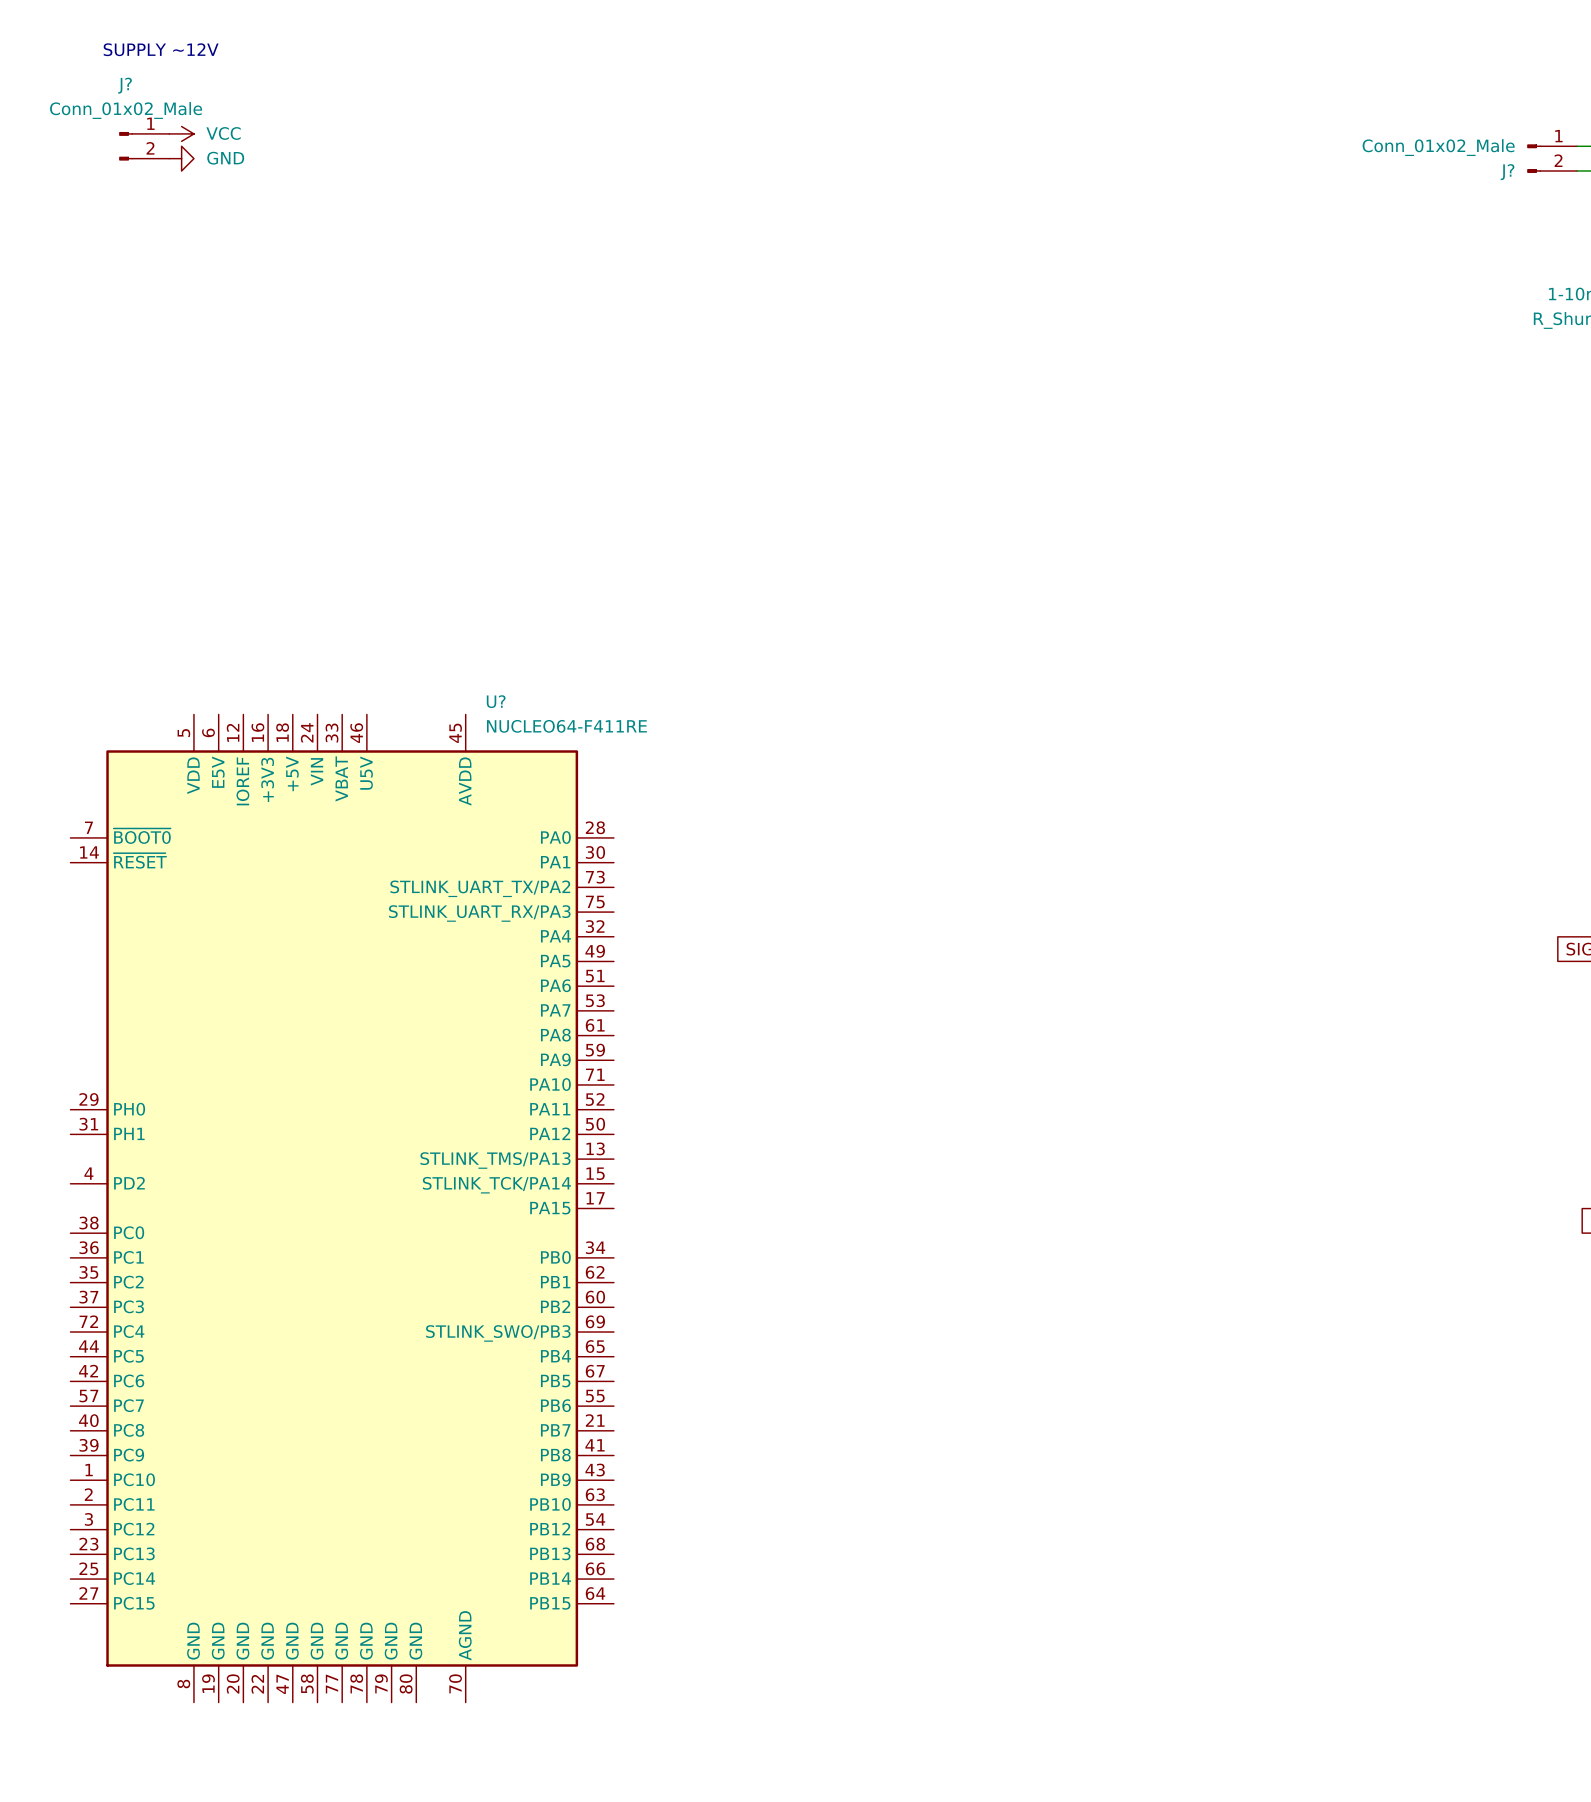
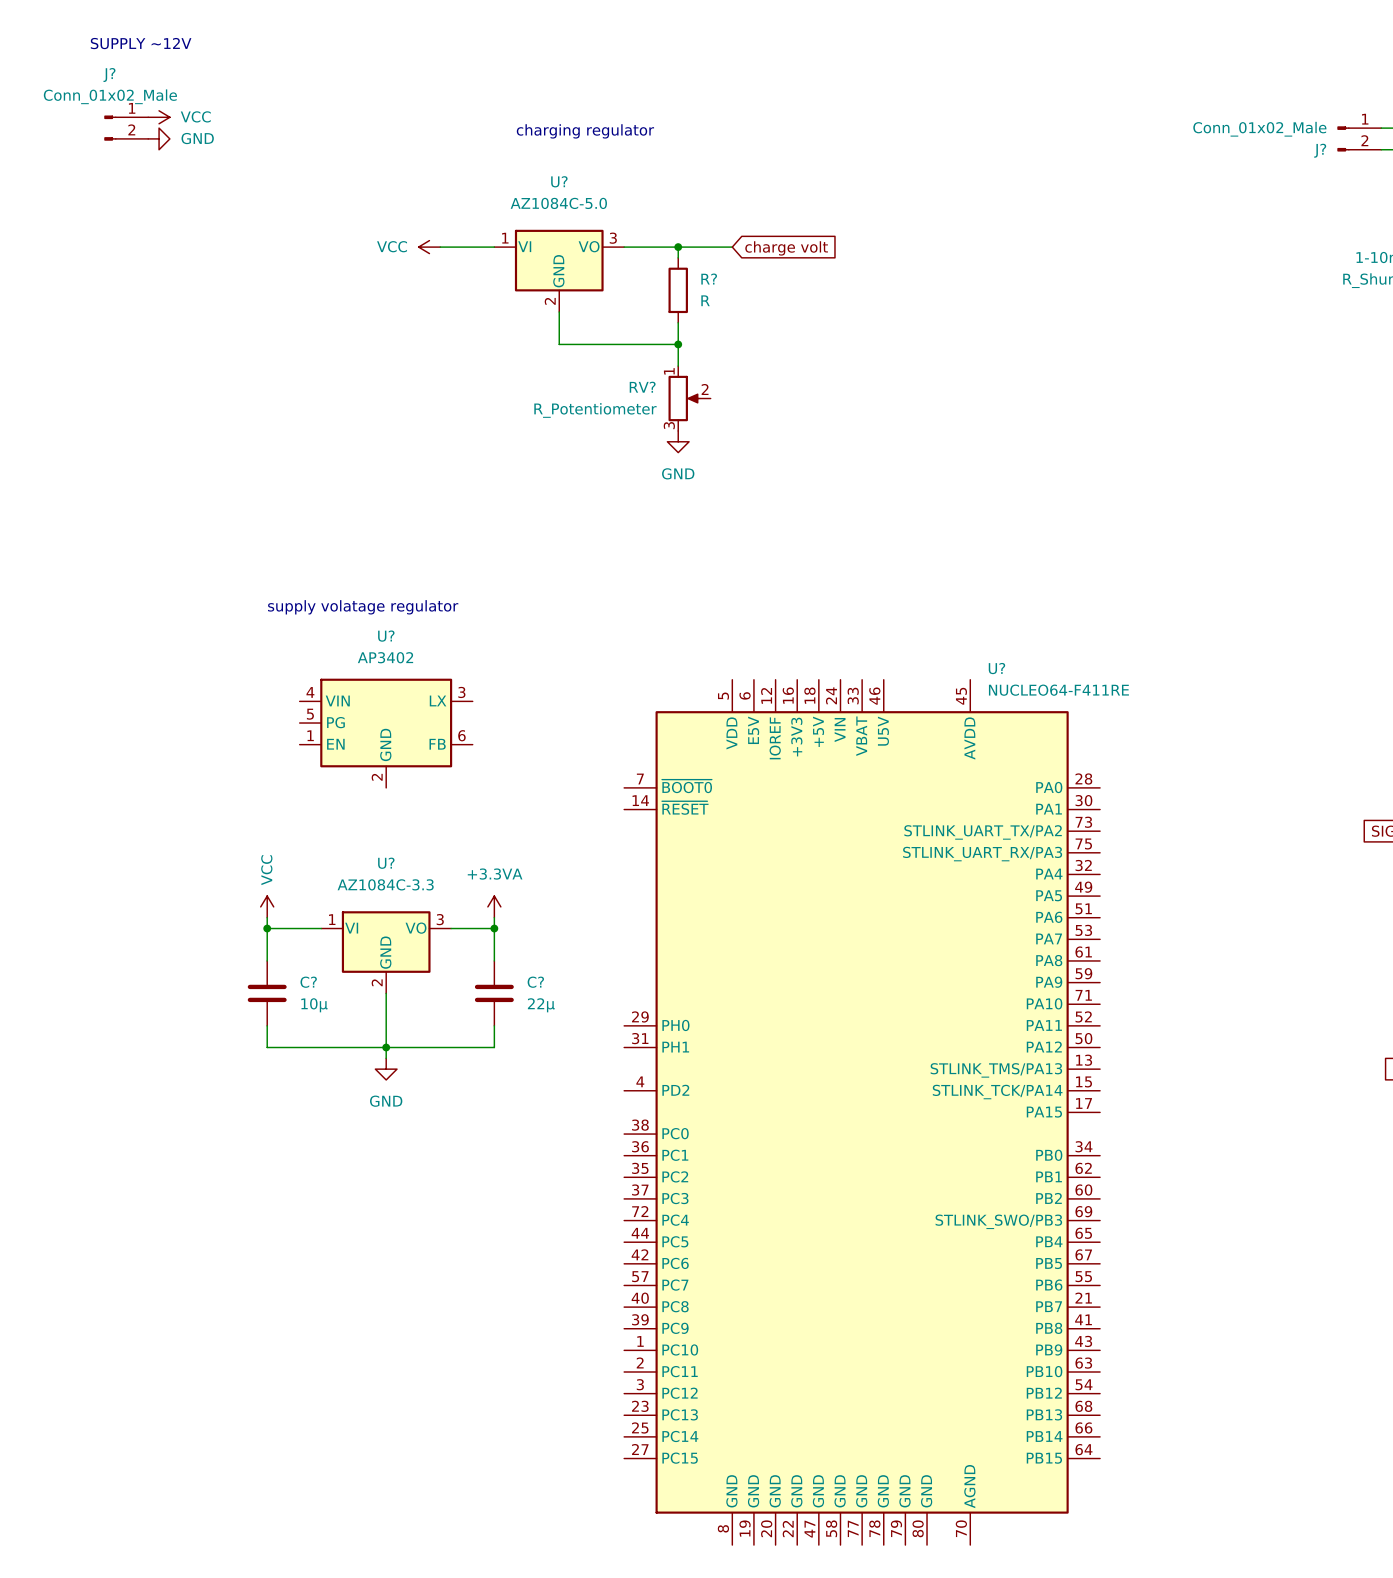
text: none -> charging regulator (585, 131)
power symbol: none -> VCC (429, 247)
wire: none -> (440, 247) (494, 247)
wire: none -> (624, 247) (732, 247)
wire: none -> (678, 247) (678, 257)
junction: none -> (678, 247)
global label: none -> charge volt (786, 248)
U?: none -> AZ1084C-5.0 (559, 270)
R?: none -> R (678, 290)
wire: none -> (559, 311) (559, 344) (678, 344)
wire: none -> (678, 322) (678, 366)
junction: none -> (678, 344)
RV?: none -> R_Potentiometer (689, 398)
power symbol: none -> GND (678, 441)
text: none -> supply volatage regulator (363, 607)
U?: none -> AP3402 (386, 733)
power symbol: none -> VCC (267, 906)
power symbol: none -> +3.3VA (494, 906)
junction: none -> (267, 928)
junction: none -> (494, 928)
U?: none -> AZ1084C-3.3 (386, 952)
C?: none -> 10µ (267, 993)
C?: none -> 22µ (494, 993)
junction: none -> (386, 1047)
U?: NUCLEO64-F411RE (342, 1208) -> none
power symbol: none -> GND (386, 1069)
U?: none -> NUCLEO64-F411RE (862, 1112)

